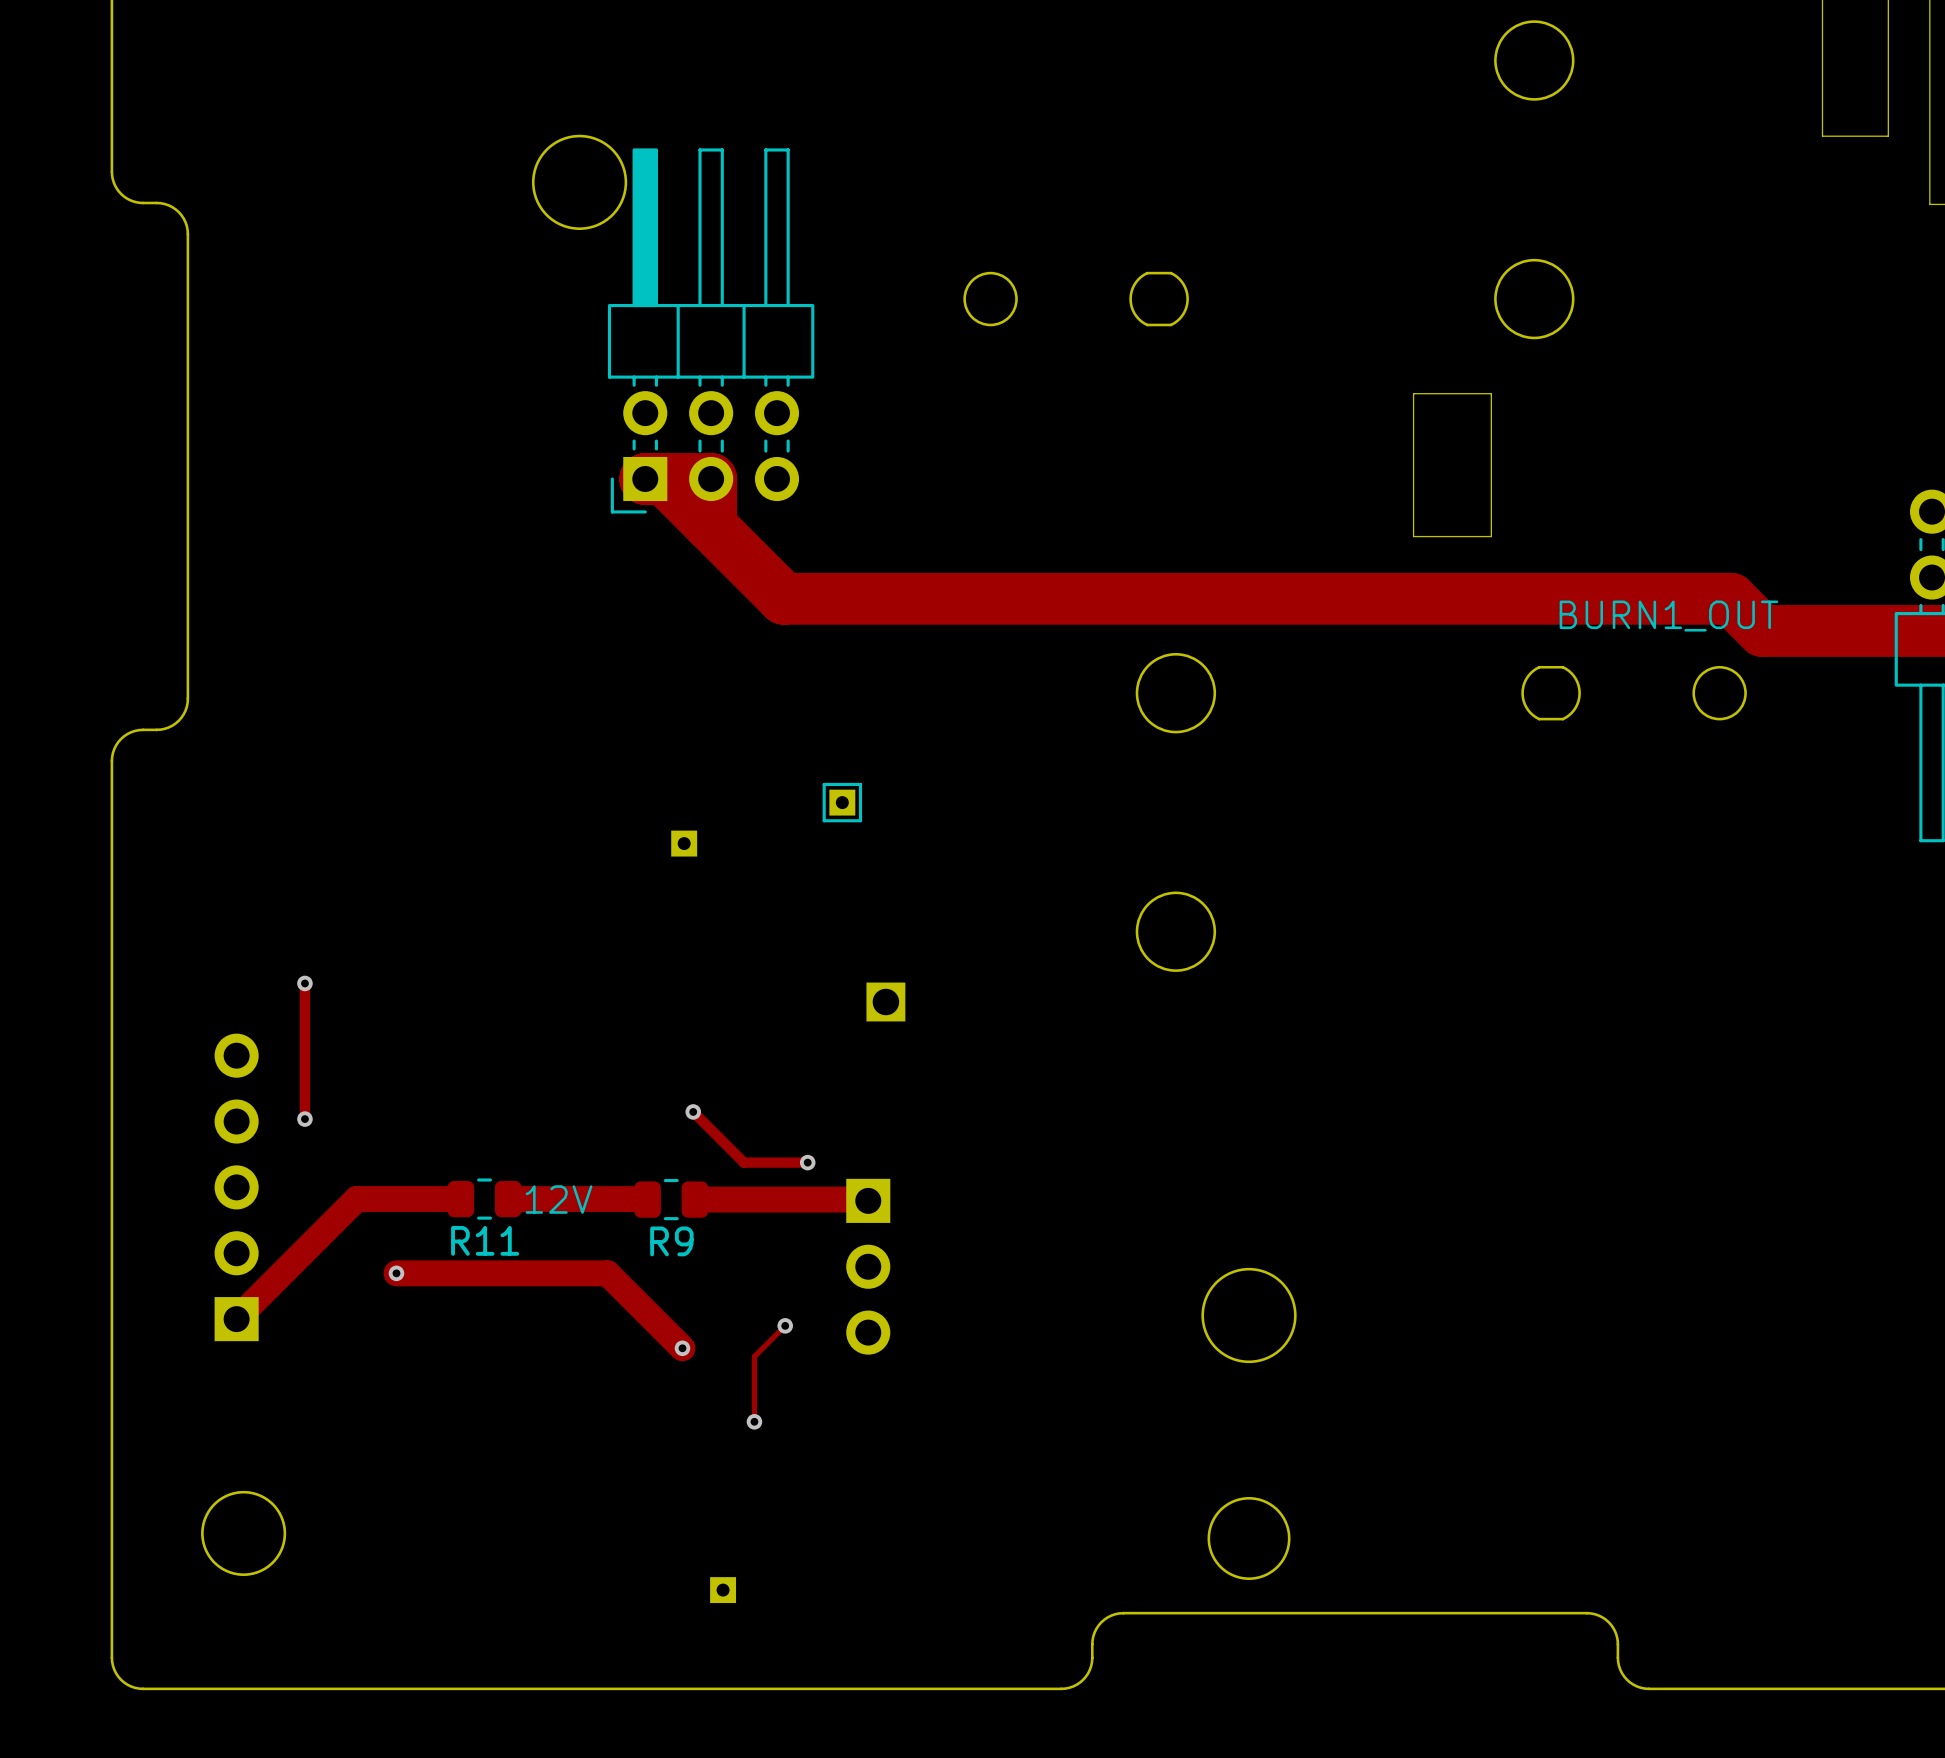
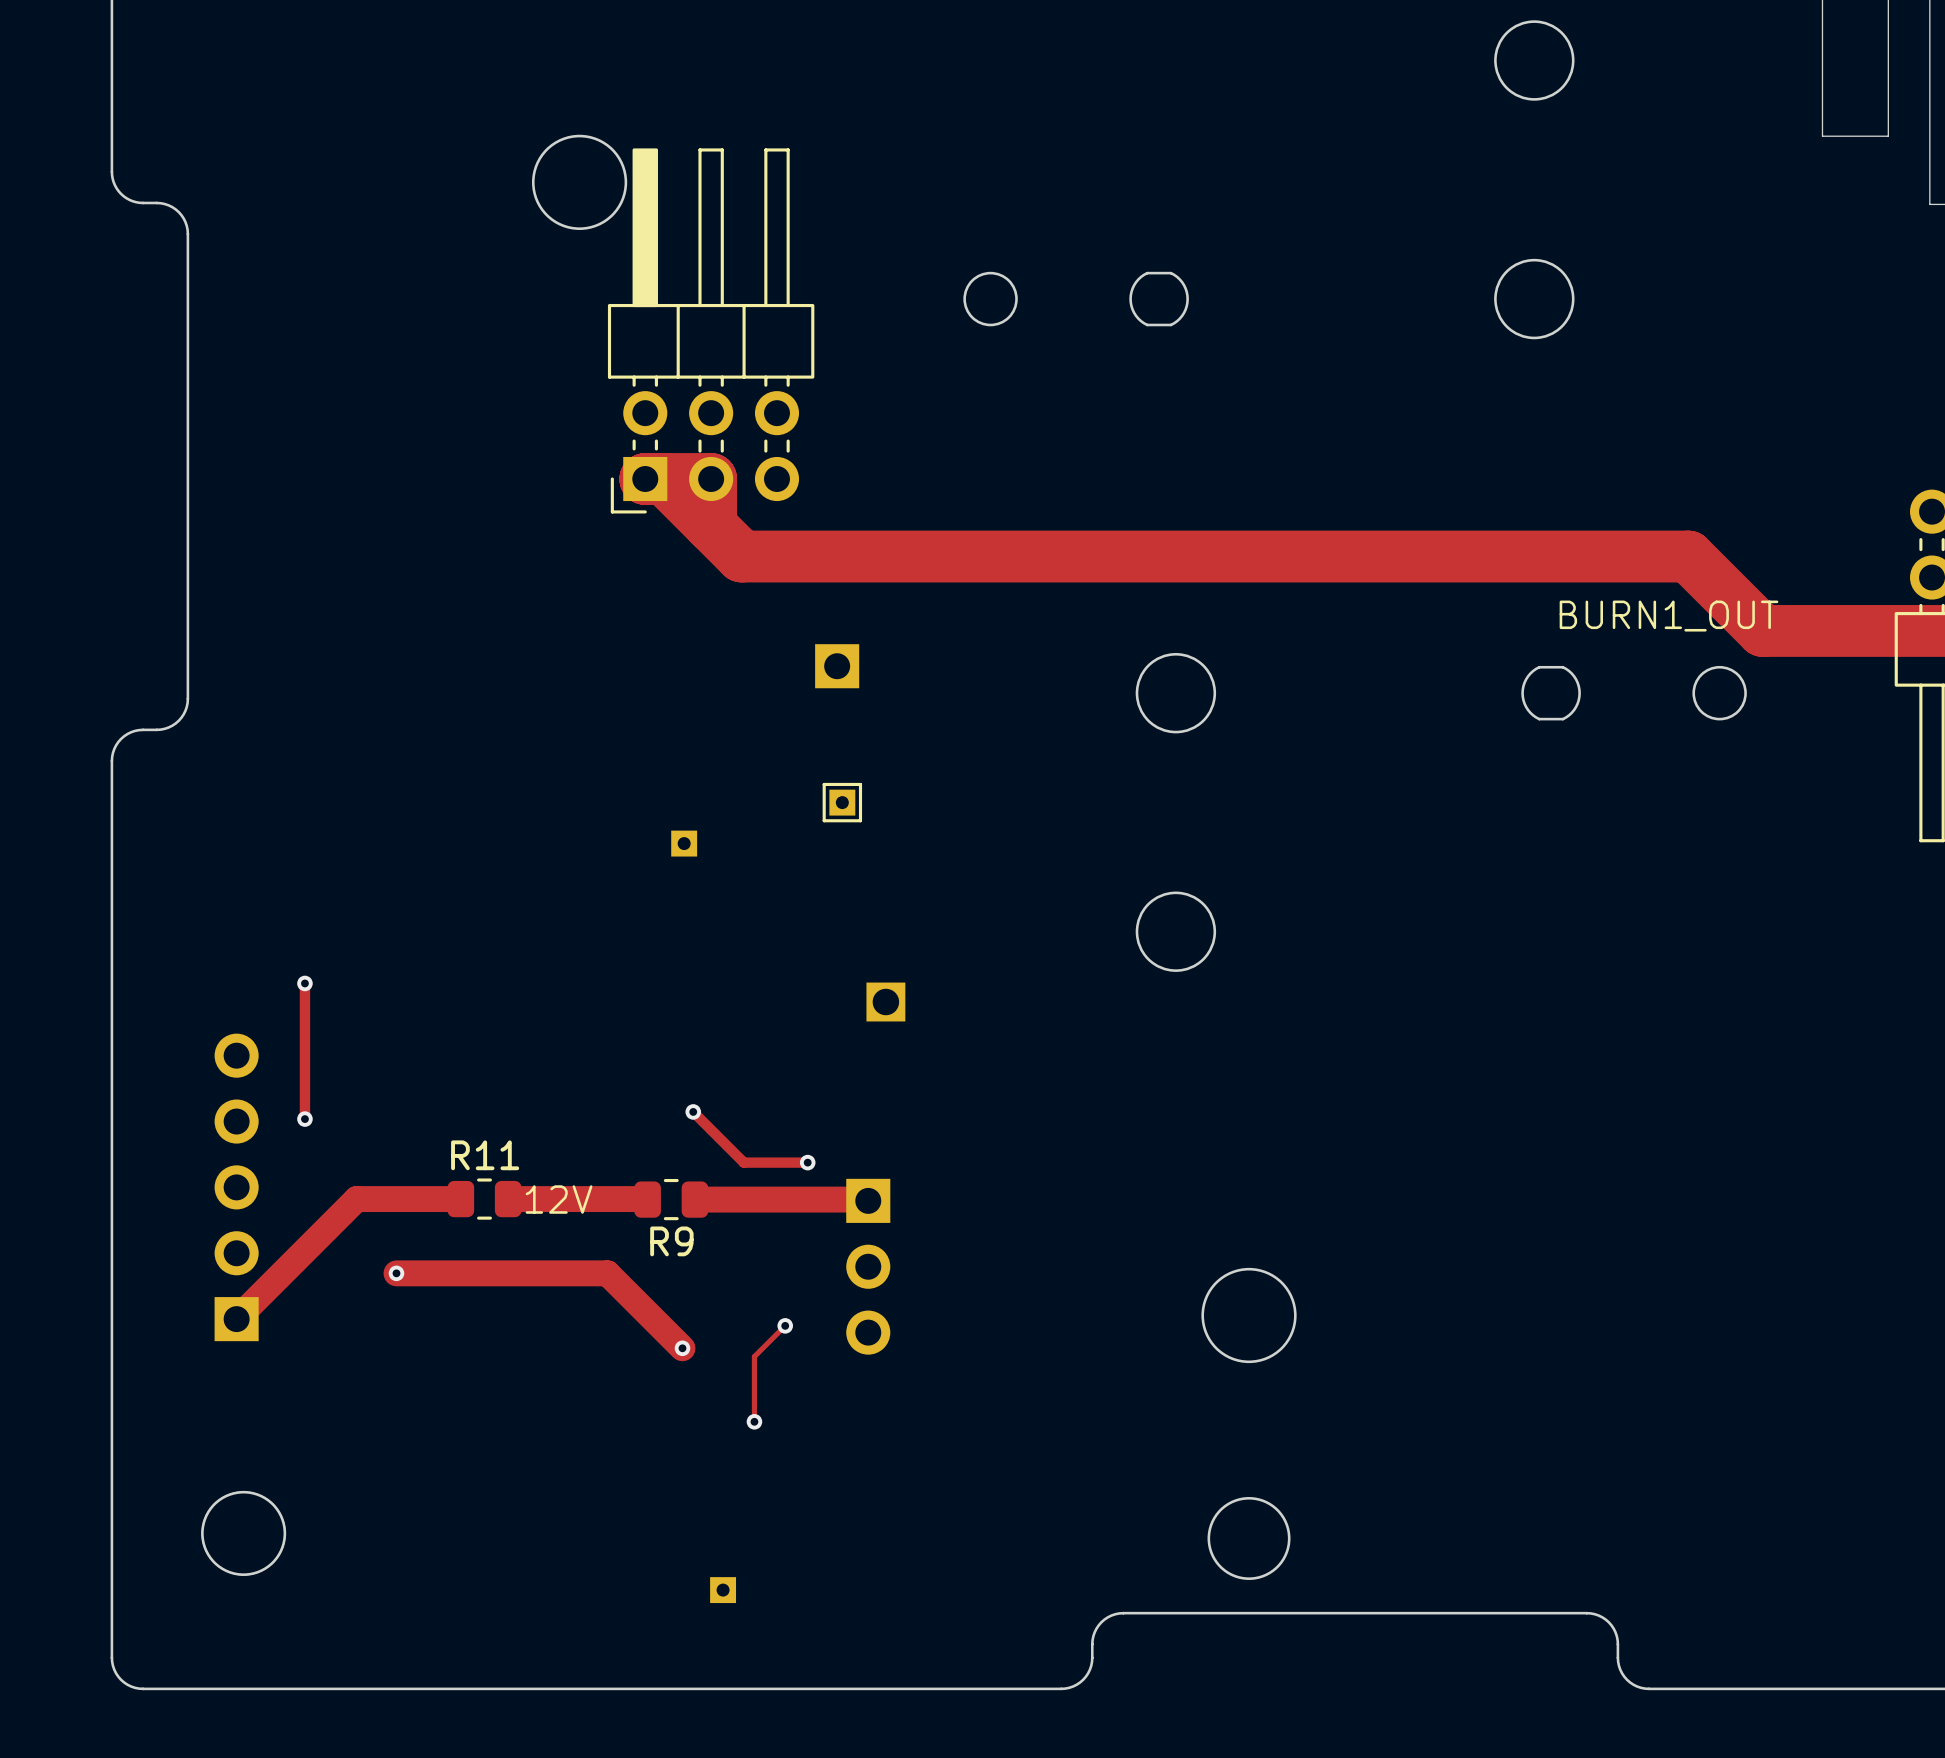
board edge: (1413, 393) (1491, 393) (1491, 536) (1413, 536) (1413, 393) -> none
track: (741, 556) (784, 598) (1730, 598) -> (741, 556) (1688, 556) (1730, 598)
part: none -> (837, 666)
R11 name position: R11 (485, 1240) -> R11 (485, 1155)

